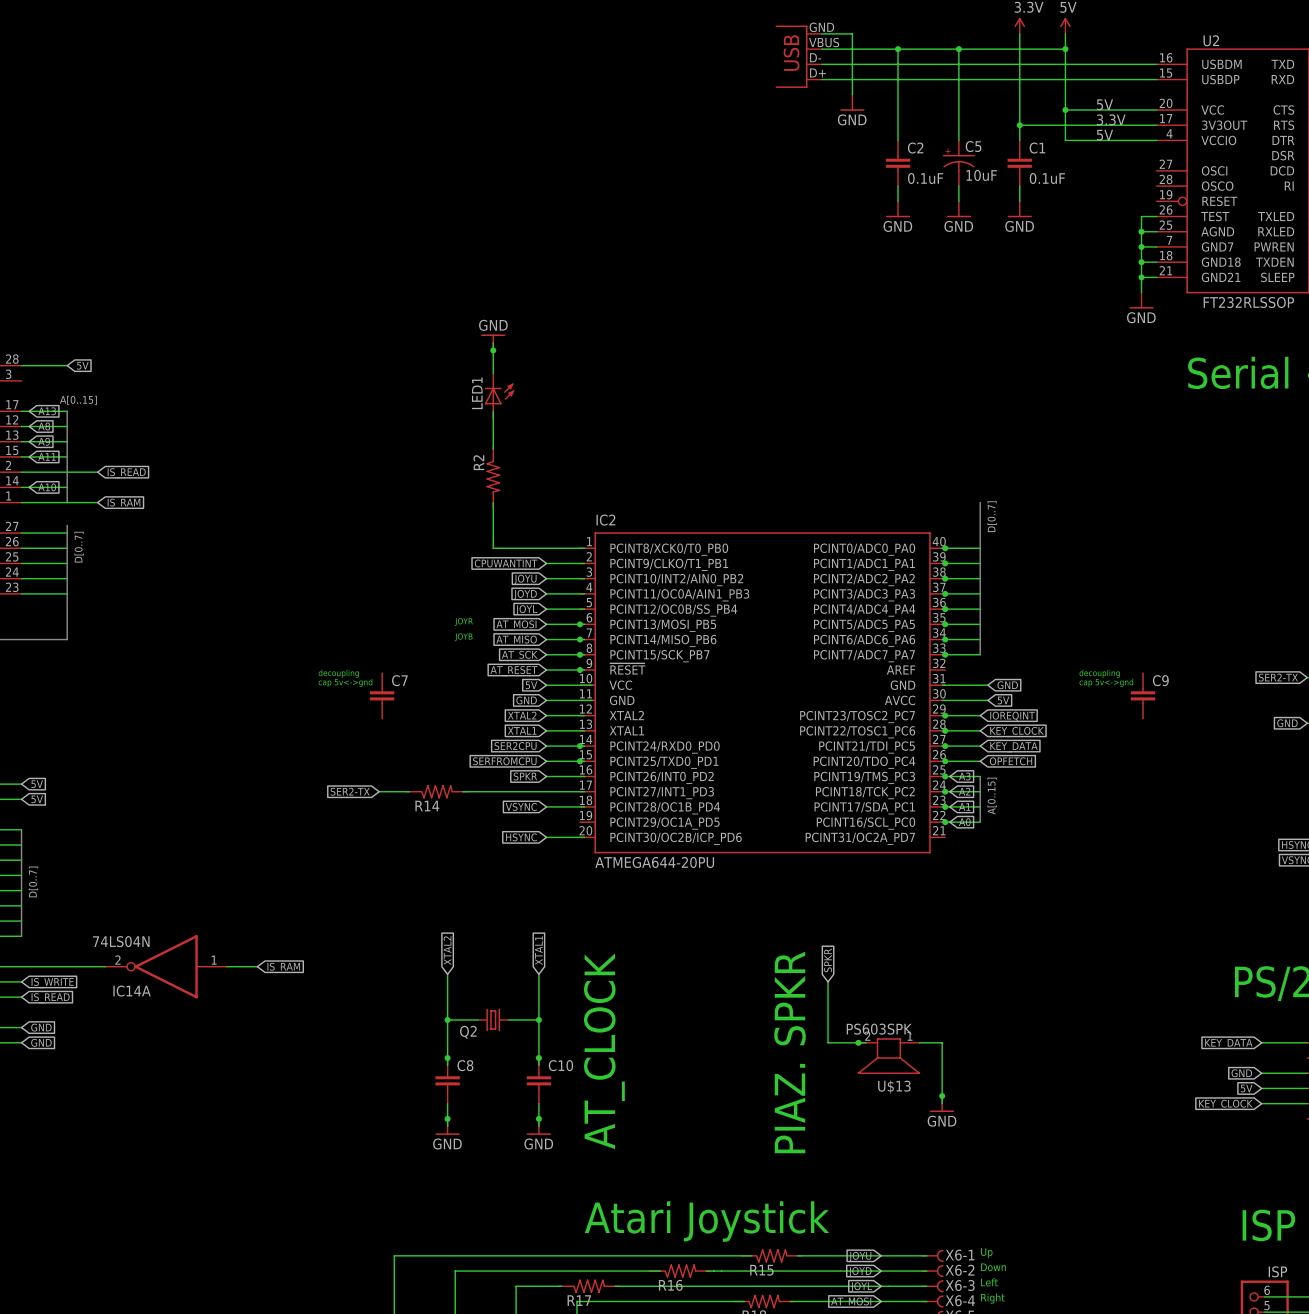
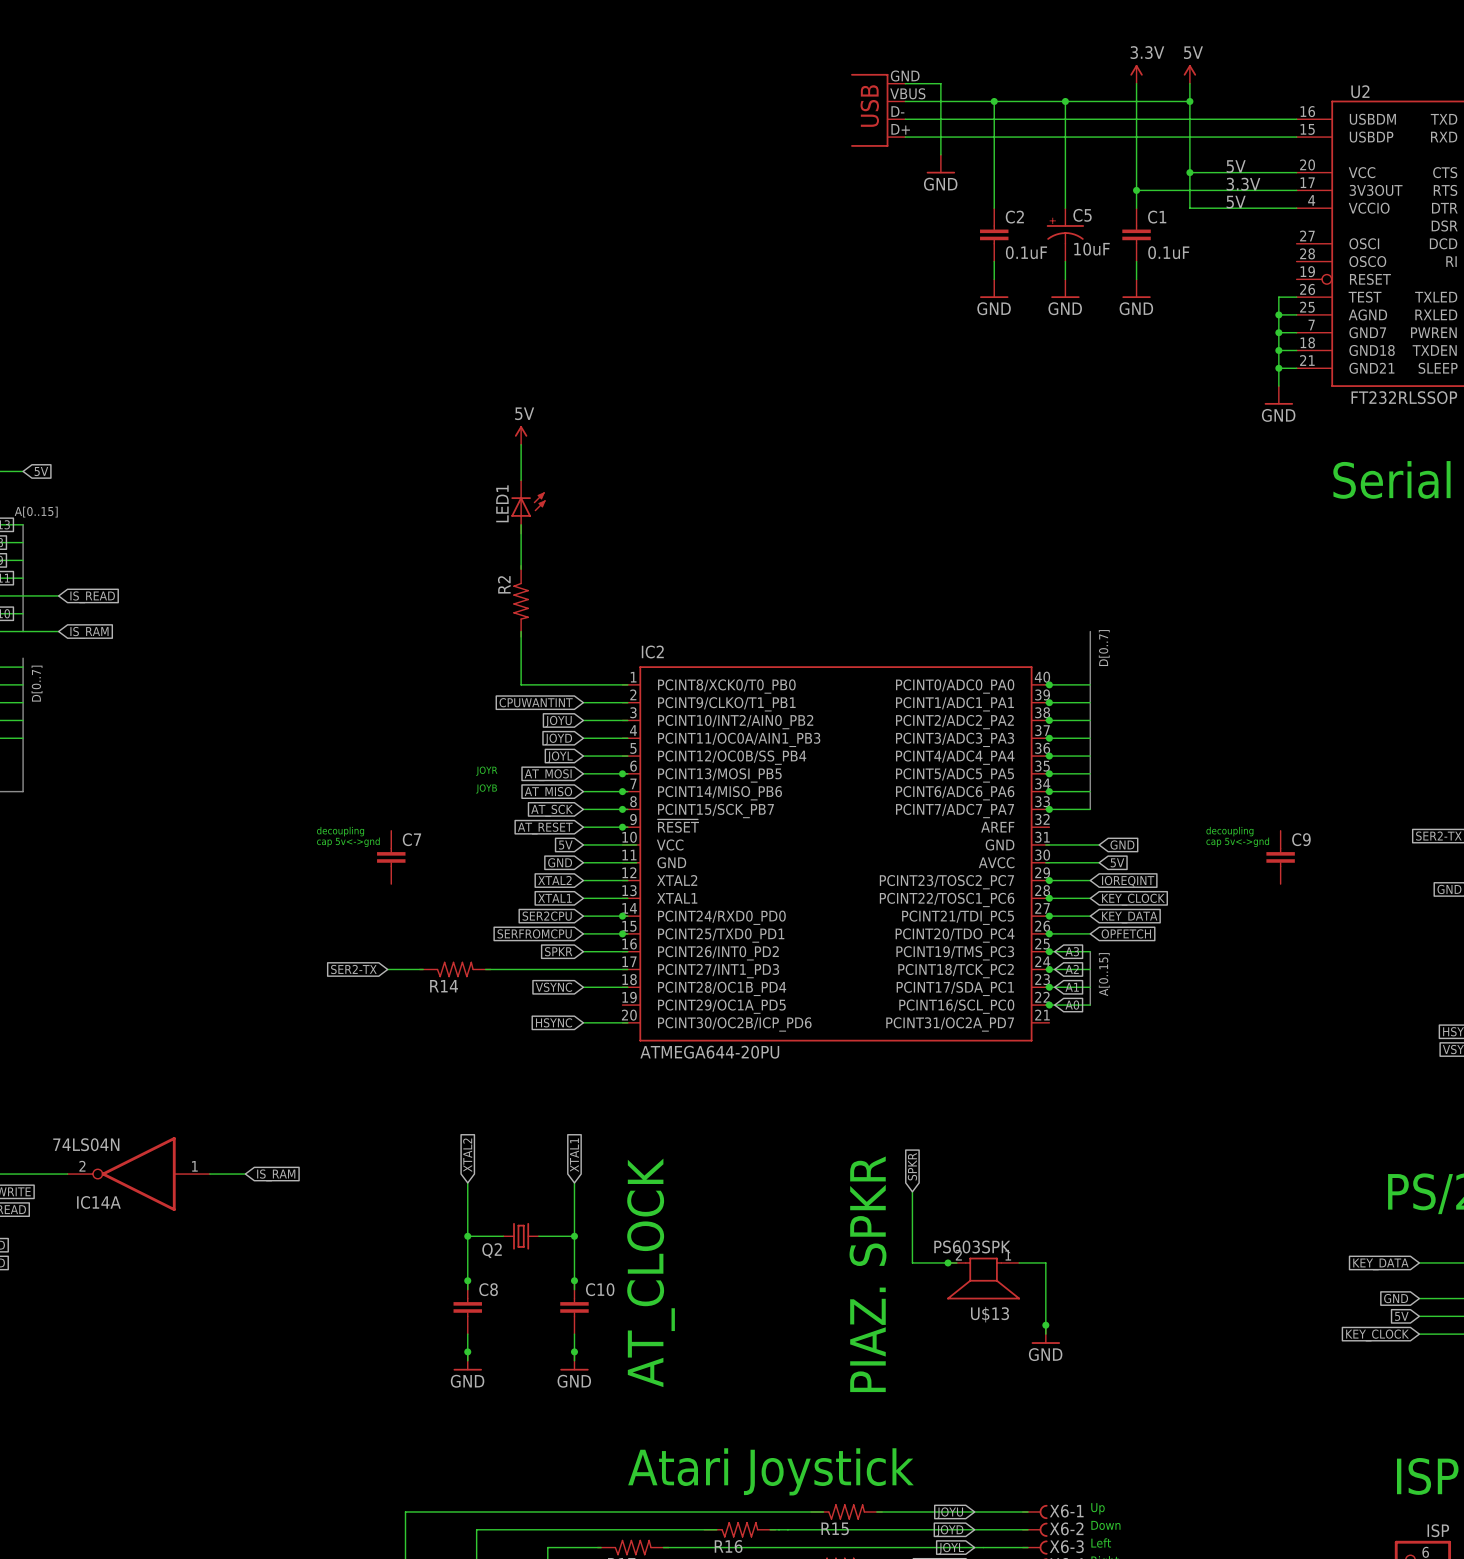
power symbol: none -> 5V (521, 435)
power symbol: GND (493, 342) -> none
junction: (493, 350) -> none

